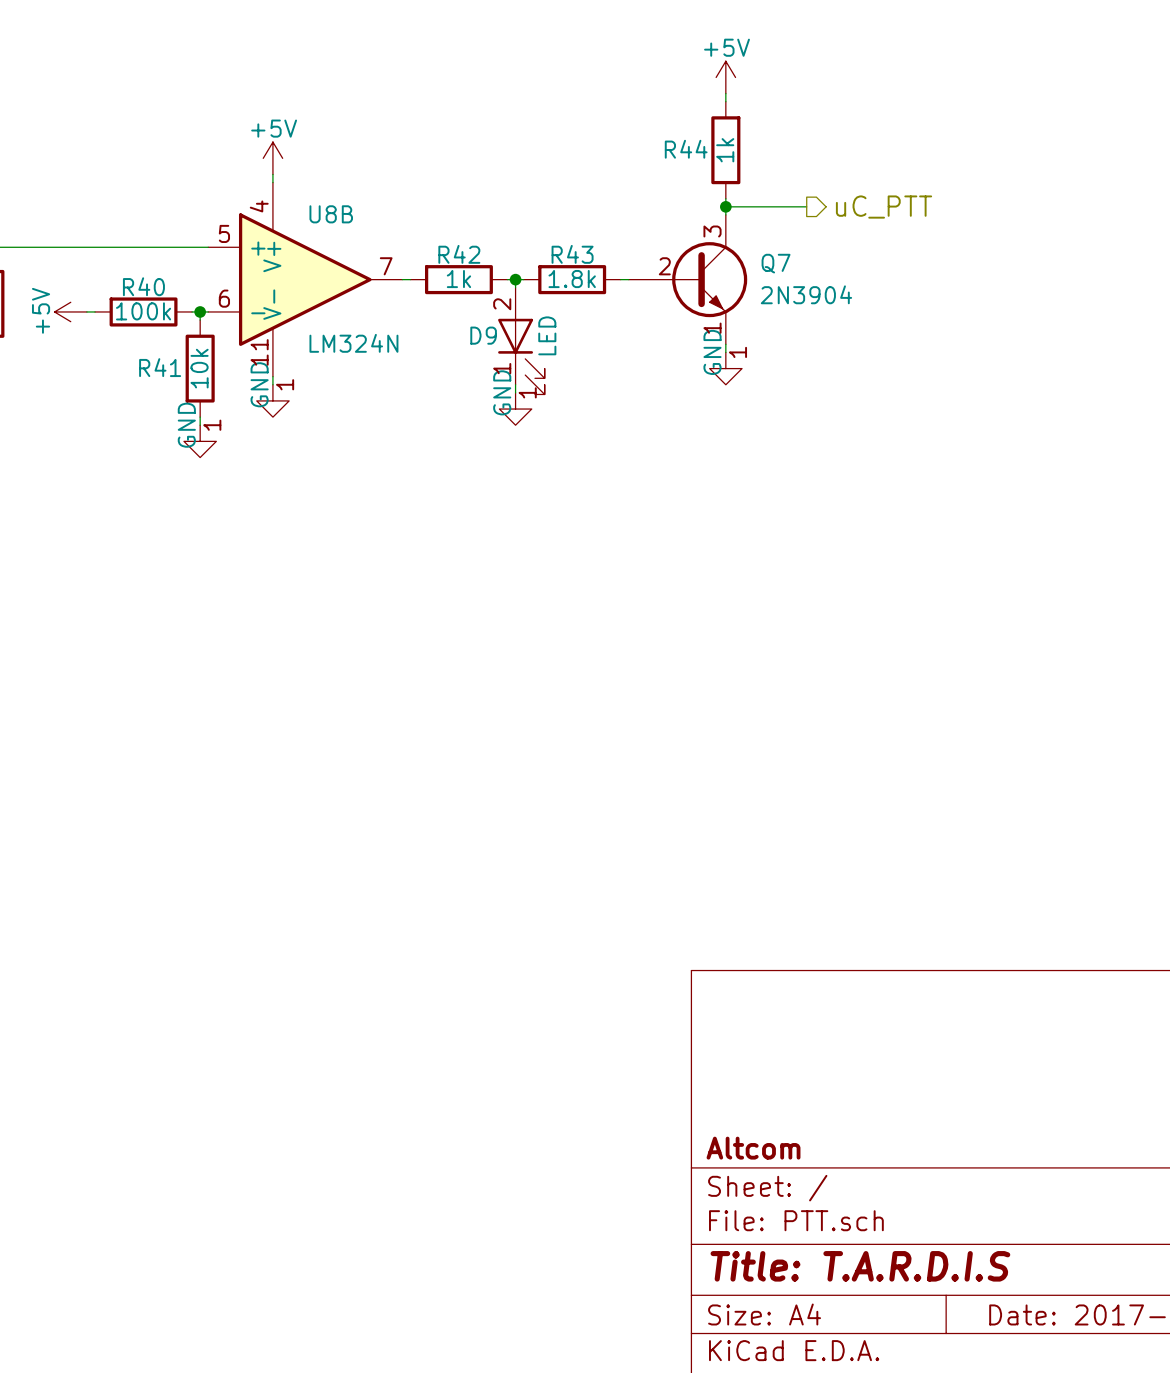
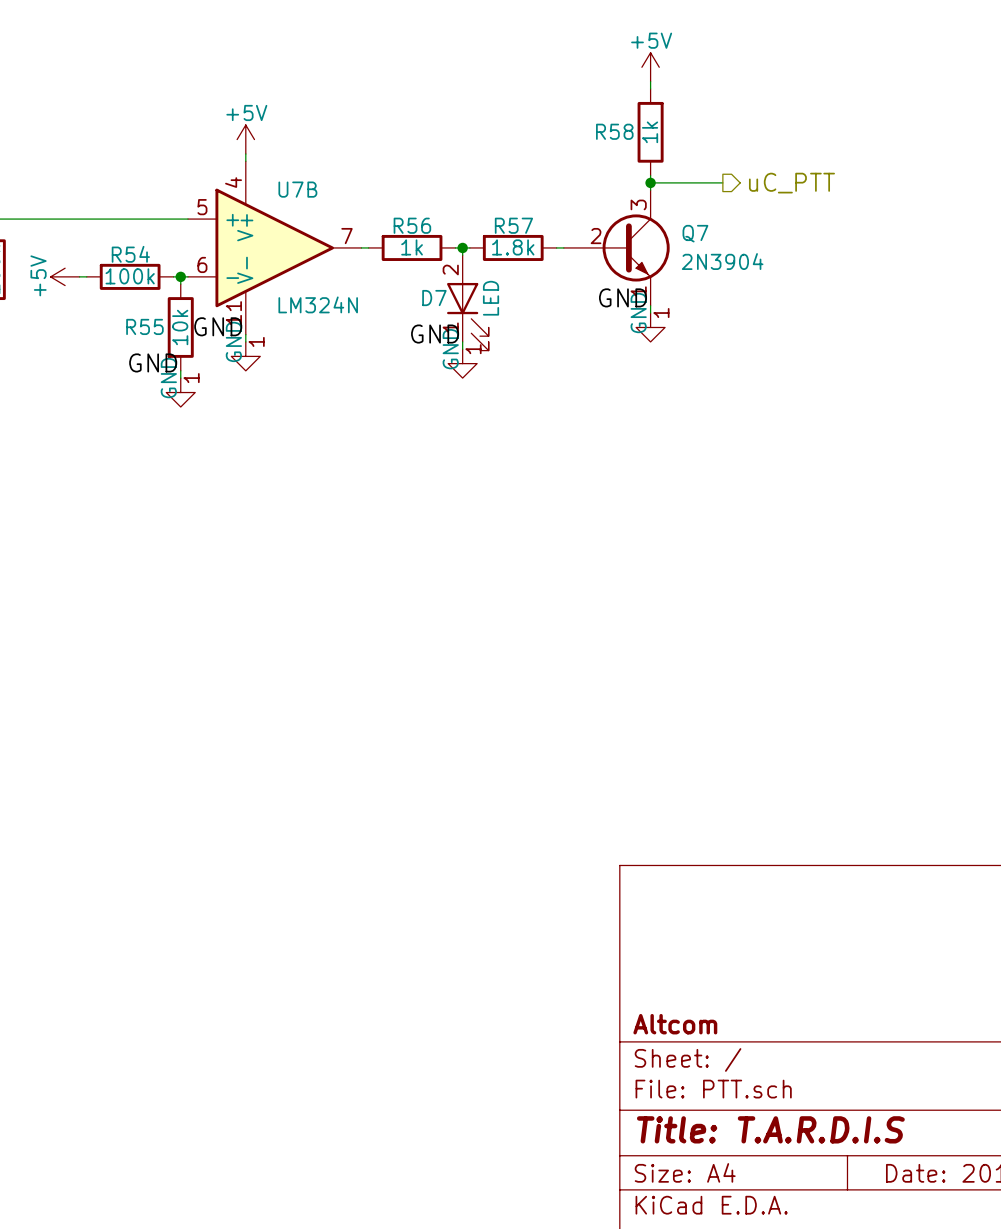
R44 name: R44 (686, 149) -> R58 (614, 131)
U8B name: U8B (331, 214) -> U7B (297, 189)
R42 name: R42 (459, 254) -> R56 (412, 225)
R43 name: R43 (572, 254) -> R57 (513, 225)
R40 name: R40 (143, 286) -> R54 (130, 254)
D9 name: D9 (483, 335) -> D7 (434, 298)
label: none -> GND (623, 297)
R41 name: R41 (160, 367) -> R55 (144, 326)
label: none -> GND (218, 326)
label: none -> GND (435, 334)
label: none -> GND (153, 362)

